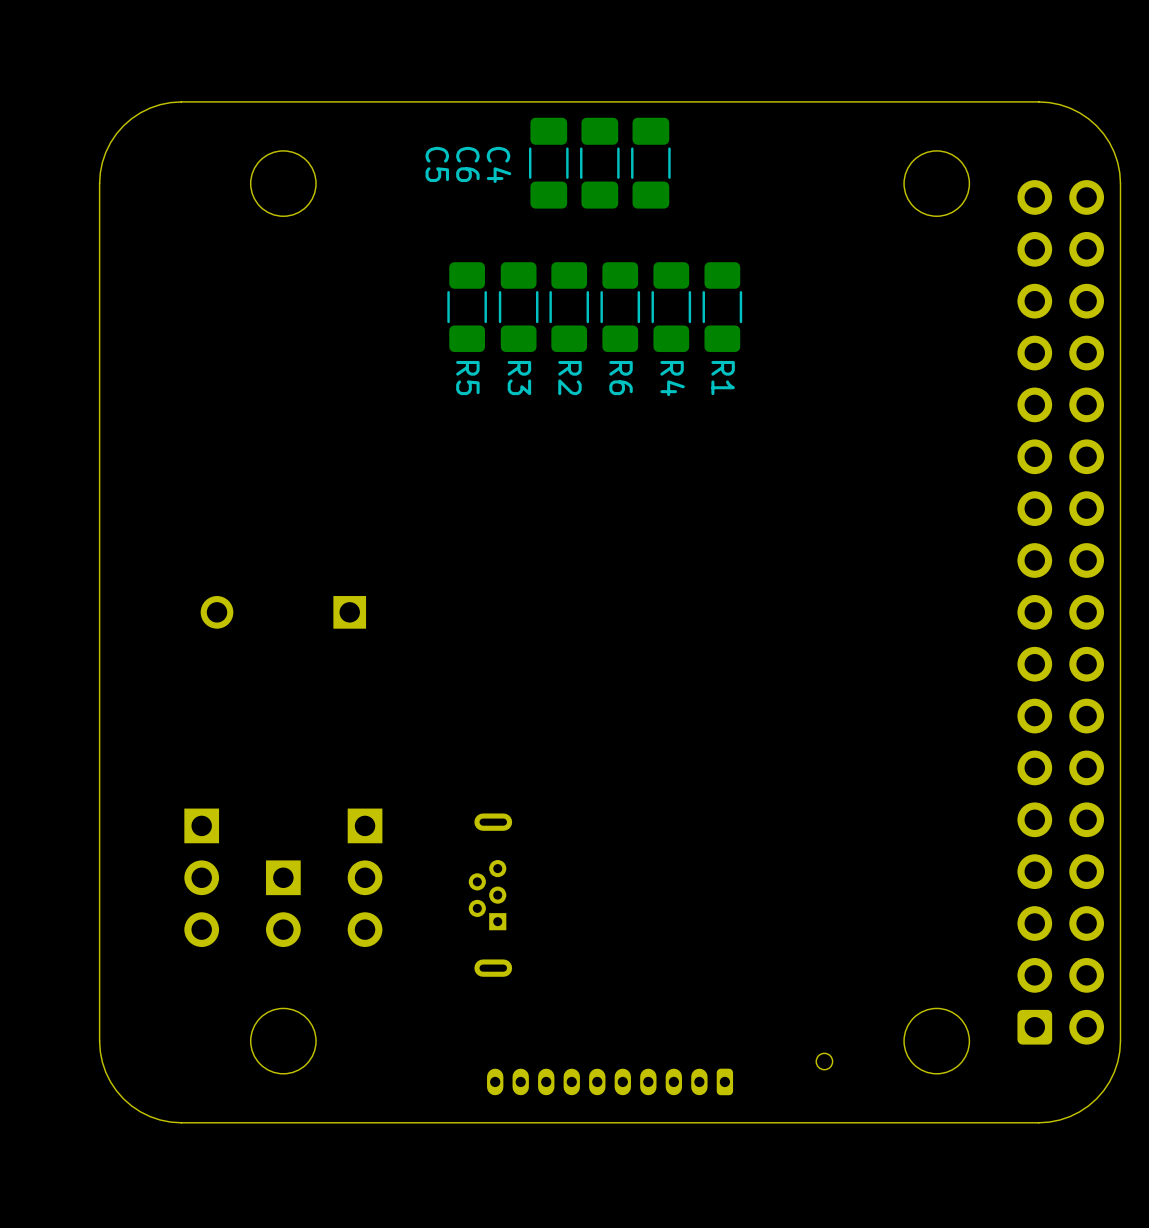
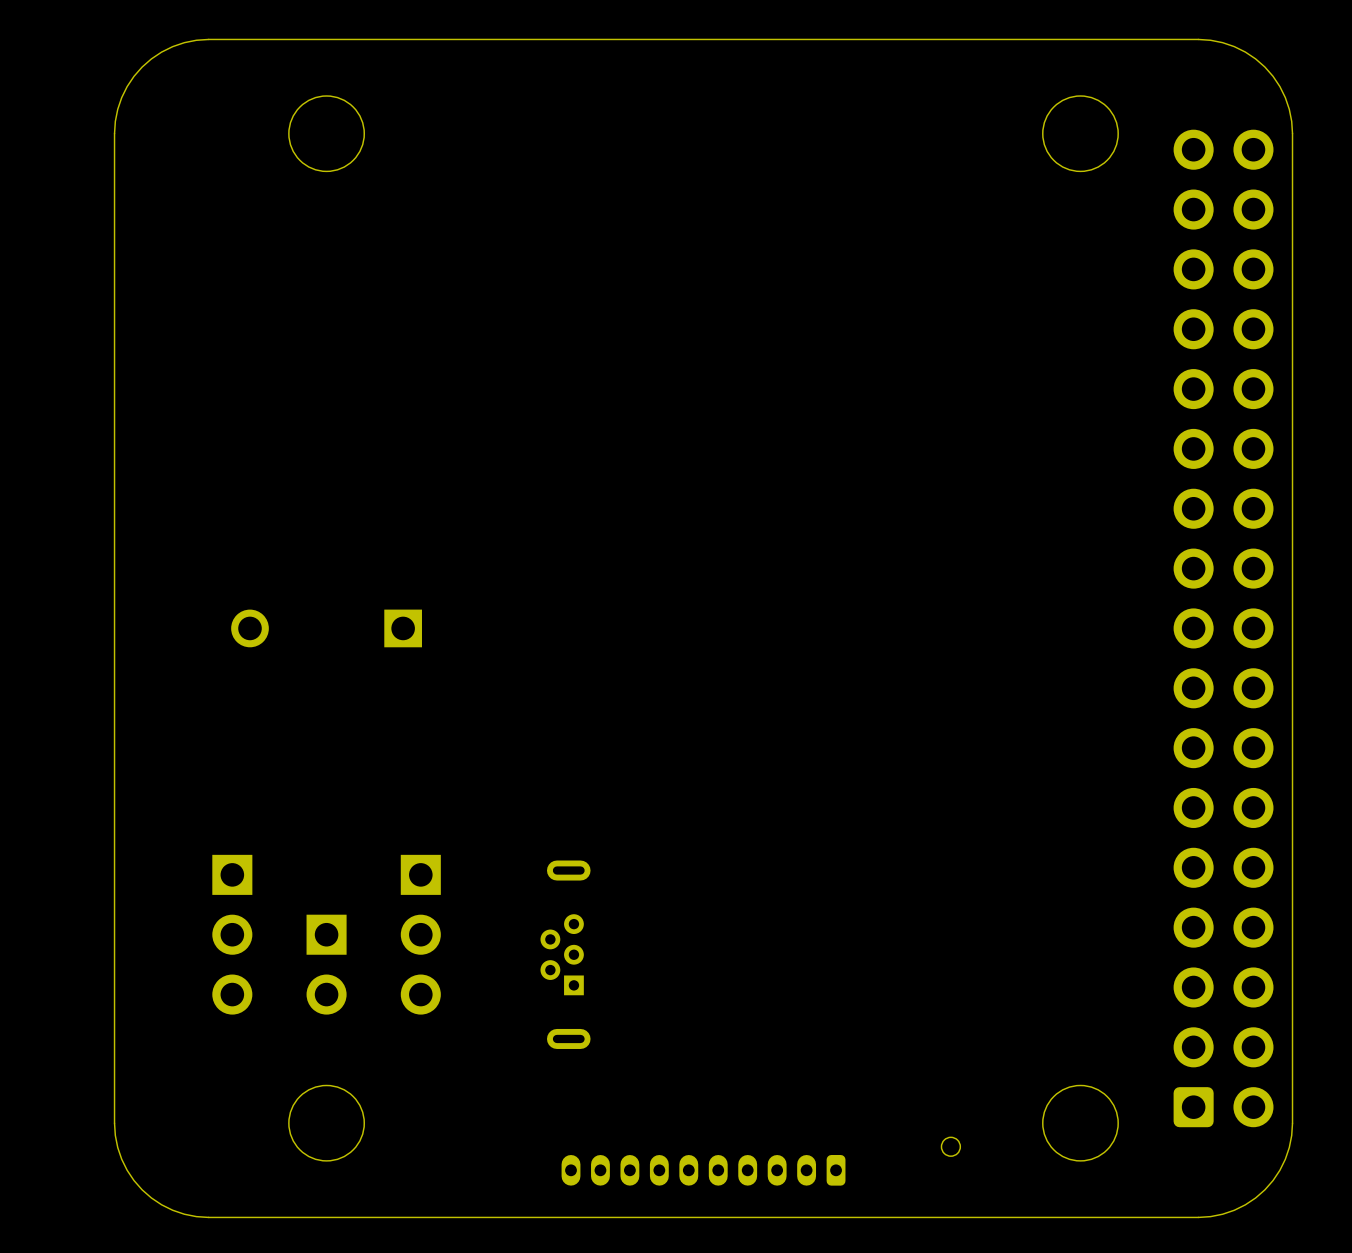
C5: (548, 163) -> none
C6: (599, 163) -> none
C4: (650, 163) -> none
R5: (467, 307) -> none
R3: (518, 307) -> none
R2: (569, 307) -> none
R6: (620, 307) -> none
R4: (671, 307) -> none
R1: (722, 307) -> none

